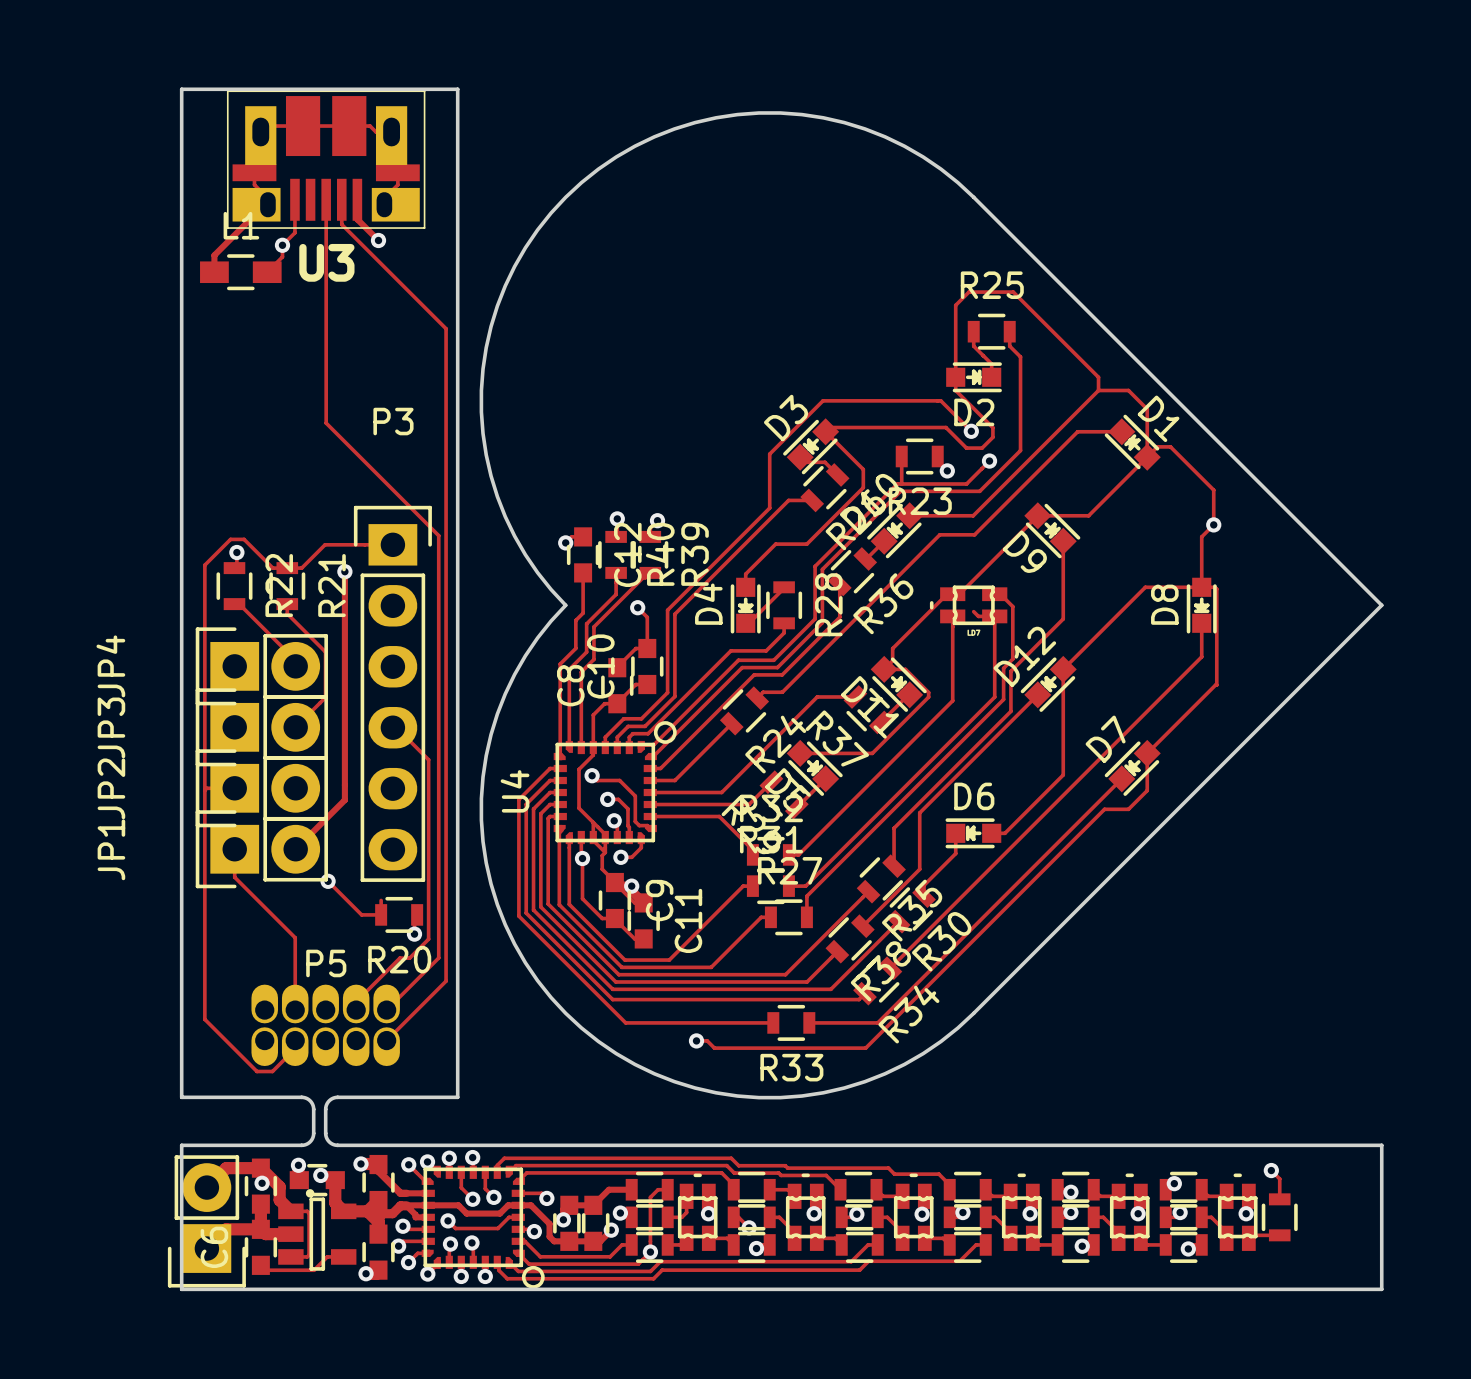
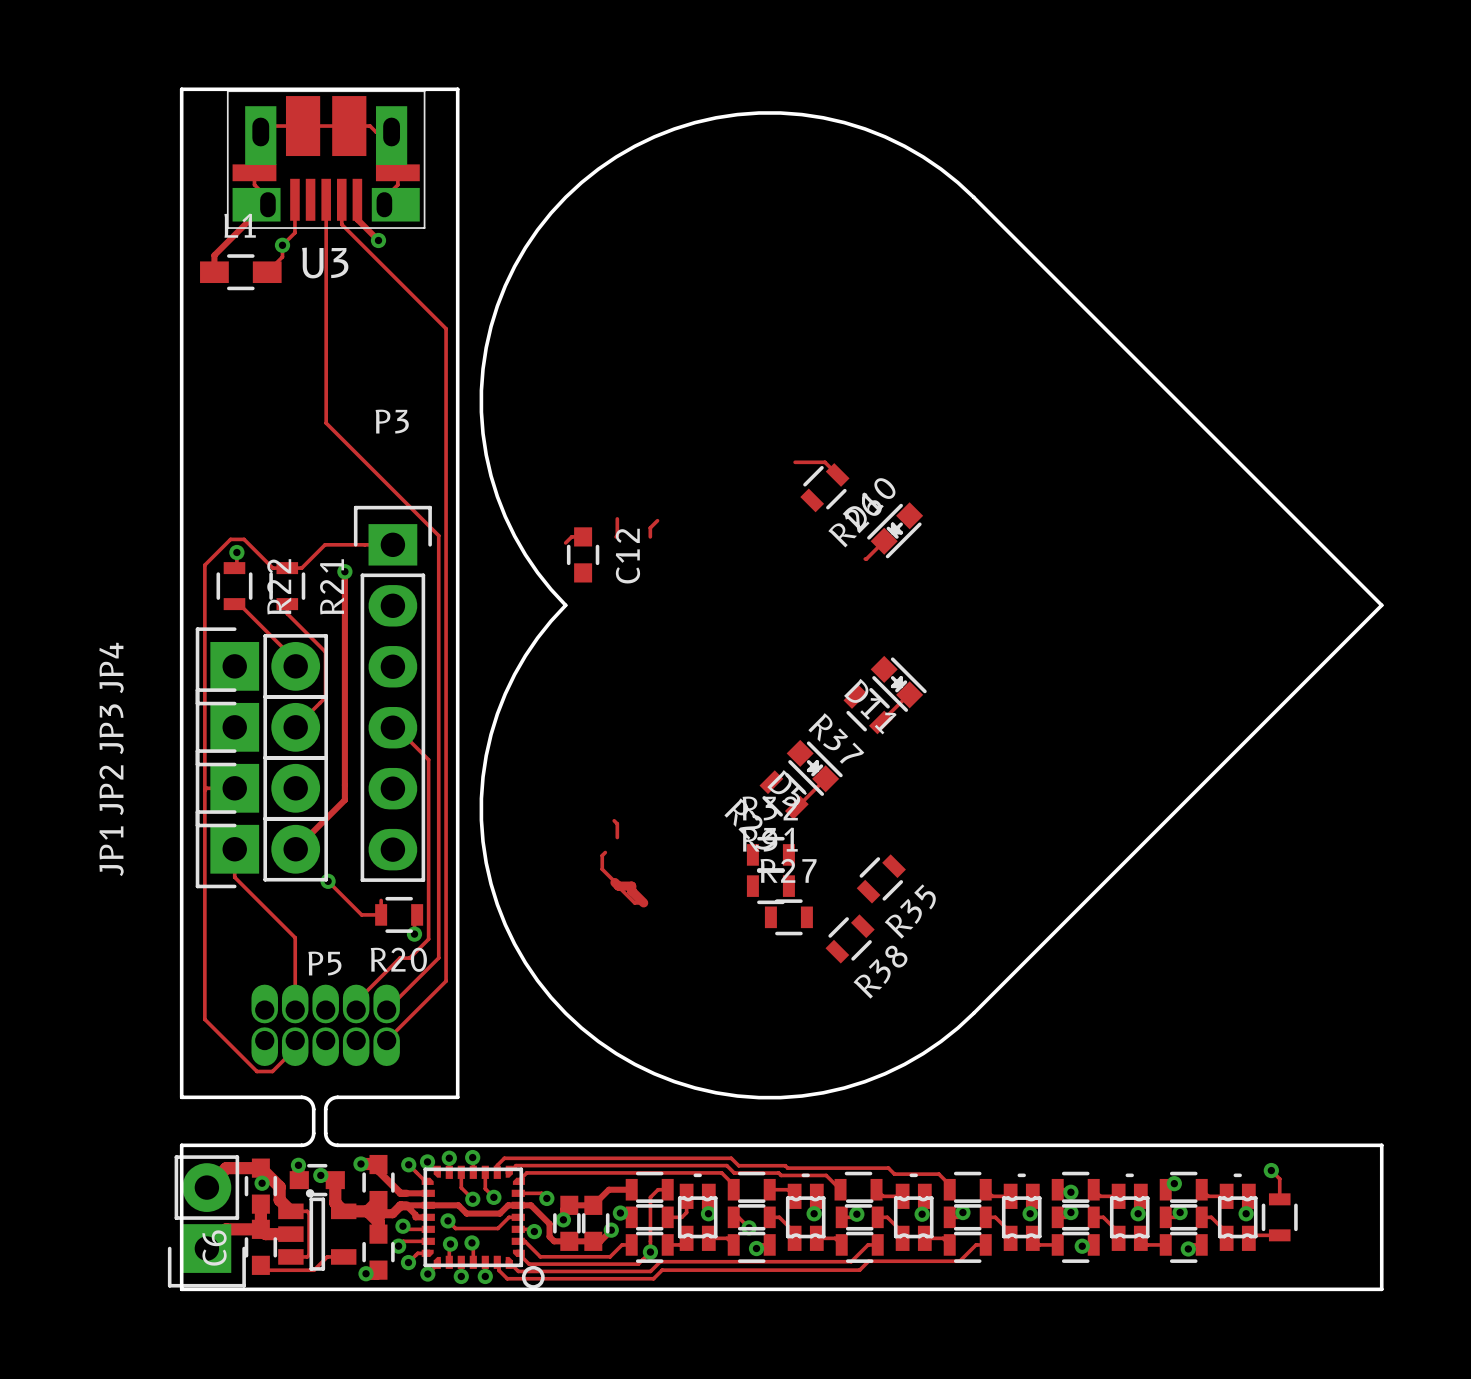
track: (973, 331) (973, 346) (991, 364) (991, 377) -> none
R25: (991, 331) -> none
track: (1009, 331) (1009, 346) (1020, 356) (1020, 450) (979, 491) (900, 491) (822, 569) (822, 622) (777, 667) (742, 667) (652, 756) -> none
D2: (974, 377) -> none
track: (1098, 390) (1098, 377) (1013, 292) (968, 292) (955, 305) (955, 390) (992, 427) (992, 437) (982, 448) (966, 448) (945, 427) (829, 427) (825, 431) (863, 469) (863, 487) (806, 544) (775, 544) (745, 574) (745, 587) -> none
track: (1098, 390) (1128, 390) (1147, 409) (1147, 457) -> none
track: (1098, 390) (973, 515) (909, 515) -> none
track: (971, 431) (940, 400) (822, 400) (769, 454) (769, 508) (667, 610) (667, 692) (641, 718) (623, 718) (605, 737) (605, 747) -> none
via: (971, 431) -> none
track: (1121, 431) (1077, 431) (974, 534) (939, 534) (782, 692) (763, 692) (757, 698) -> none
D1: (1132, 442) -> none
D3: (811, 446) -> none
track: (901, 456) (901, 483) -> none
R23: (919, 456) -> none
track: (989, 461) (966, 484) (897, 483) (815, 566) (815, 619) (773, 660) (738, 660) (653, 745) (641, 745) -> none
via: (989, 461) -> none
via: (947, 470) -> none
track: (812, 500) (788, 500) (674, 614) (674, 696) (645, 726) (628, 726) (617, 737) (617, 747) -> none
via: (617, 518) -> none
via: (657, 520) -> none
via: (1213, 524) -> none
D9: (1052, 530) -> none
track: (1063, 541) (1063, 618) (1010, 671) (1010, 711) (894, 828) (894, 866) -> none
via: (565, 542) -> none
R40: (616, 554) -> none
R39: (650, 554) -> none
R36: (852, 571) -> none
track: (583, 572) (583, 613) (575, 620) (575, 648) (560, 664) (560, 758) -> none
track: (616, 572) (616, 594) (586, 623) (586, 652) (569, 669) (569, 745) -> none
track: (650, 572) (593, 626) (593, 659) (581, 672) (581, 747) -> none
track: (839, 584) (839, 617) (782, 674) (754, 674) (660, 768) (650, 768) -> none
track: (784, 587) (749, 623) (745, 623) -> none
track: (1201, 587) (1201, 536) (1213, 524) (1213, 490) (1170, 446) (1157, 446) (1088, 515) (1037, 515) (959, 594) (947, 594) (892, 648) (892, 660) (884, 669) (905, 669) (928, 692) (928, 697) (872, 753) (800, 753) -> none
track: (994, 594) (1000, 594) (1012, 606) (1012, 659) (1003, 668) (1003, 699) (806, 896) (806, 917) -> none
D4: (745, 605) -> none
R28: (784, 605) -> none
part: (968, 605) -> none
D8: (1201, 605) -> none
track: (637, 607) (647, 617) (647, 648) (635, 648) (617, 667) -> none
via: (637, 607) -> none
track: (973, 611) (978, 616) (994, 616) (994, 697) (805, 886) (788, 886) -> none
track: (952, 616) (952, 700) (798, 854) (788, 854) -> none
track: (784, 623) (784, 632) (766, 650) (730, 650) (648, 733) (632, 733) (629, 737) (629, 747) -> none
track: (1201, 623) (1201, 656) (890, 968) -> none
C10: (647, 666) -> none
D12: (1048, 683) -> none
track: (647, 684) (635, 684) (617, 703) (604, 703) (593, 715) (593, 755) (579, 769) (579, 808) (605, 834) (605, 852) (593, 840) (593, 822) -> none
C8: (617, 685) -> none
track: (1037, 694) (919, 812) (919, 869) (862, 926) -> none
track: (855, 696) (817, 696) (721, 792) (650, 792) -> none
R24: (744, 710) -> none
track: (731, 723) (674, 780) (650, 780) -> none
D7: (1132, 767) -> none
track: (560, 768) (550, 768) (518, 799) (518, 916) (625, 1022) (773, 1022) -> none
track: (592, 775) (596, 780) (619, 780) (635, 796) (635, 821) (639, 825) (648, 826) -> none
via: (592, 775) -> none
track: (1121, 778) (877, 1022) (809, 1022) -> none
track: (560, 780) (550, 780) (526, 804) (526, 913) (612, 999) (859, 999) (864, 993) -> none
U4: (615, 782) -> none
track: (771, 782) (749, 804) (650, 804) -> none
track: (560, 792) (550, 792) (533, 809) (533, 910) (612, 989) (830, 989) (898, 921) -> none
track: (607, 799) (618, 799) (627, 808) (629, 837) -> none
via: (607, 799) -> none
track: (560, 804) (550, 804) (540, 813) (540, 907) (615, 982) (807, 982) (837, 951) -> none
track: (560, 816) (550, 816) (548, 818) (548, 904) (618, 974) (785, 974) (868, 891) -> none
track: (650, 816) (719, 816) (752, 850) (752, 854) -> none
via: (614, 820) -> none
track: (561, 830) (559, 832) (559, 904) (621, 967) (711, 967) (761, 917) (770, 917) -> none
track: (955, 833) (955, 853) (924, 885) (924, 896) -> none
D6: (973, 833) -> none
track: (991, 833) (1004, 833) (1063, 775) (1063, 669) (1145, 587) (1214, 587) (1216, 589) (1216, 685) (1147, 753) (1147, 790) (1128, 809) (1104, 809) (865, 1048) (714, 1048) (707, 1040) (696, 1040) -> none
track: (581, 837) (582, 898) (602, 918) (614, 918) (634, 938) (643, 938) -> none
track: (569, 839) (569, 904) (624, 960) (669, 960) (743, 886) (752, 886) -> none
track: (641, 839) (641, 847) (631, 857) (620, 857) -> none
via: (620, 857) -> none
via: (582, 858) -> none
via: (631, 886) -> none
C9: (614, 900) -> none
R30: (911, 908) -> none
C11: (643, 920) -> none
R34: (877, 980) -> none
R33: (791, 1022) -> none
via: (696, 1040) -> none

